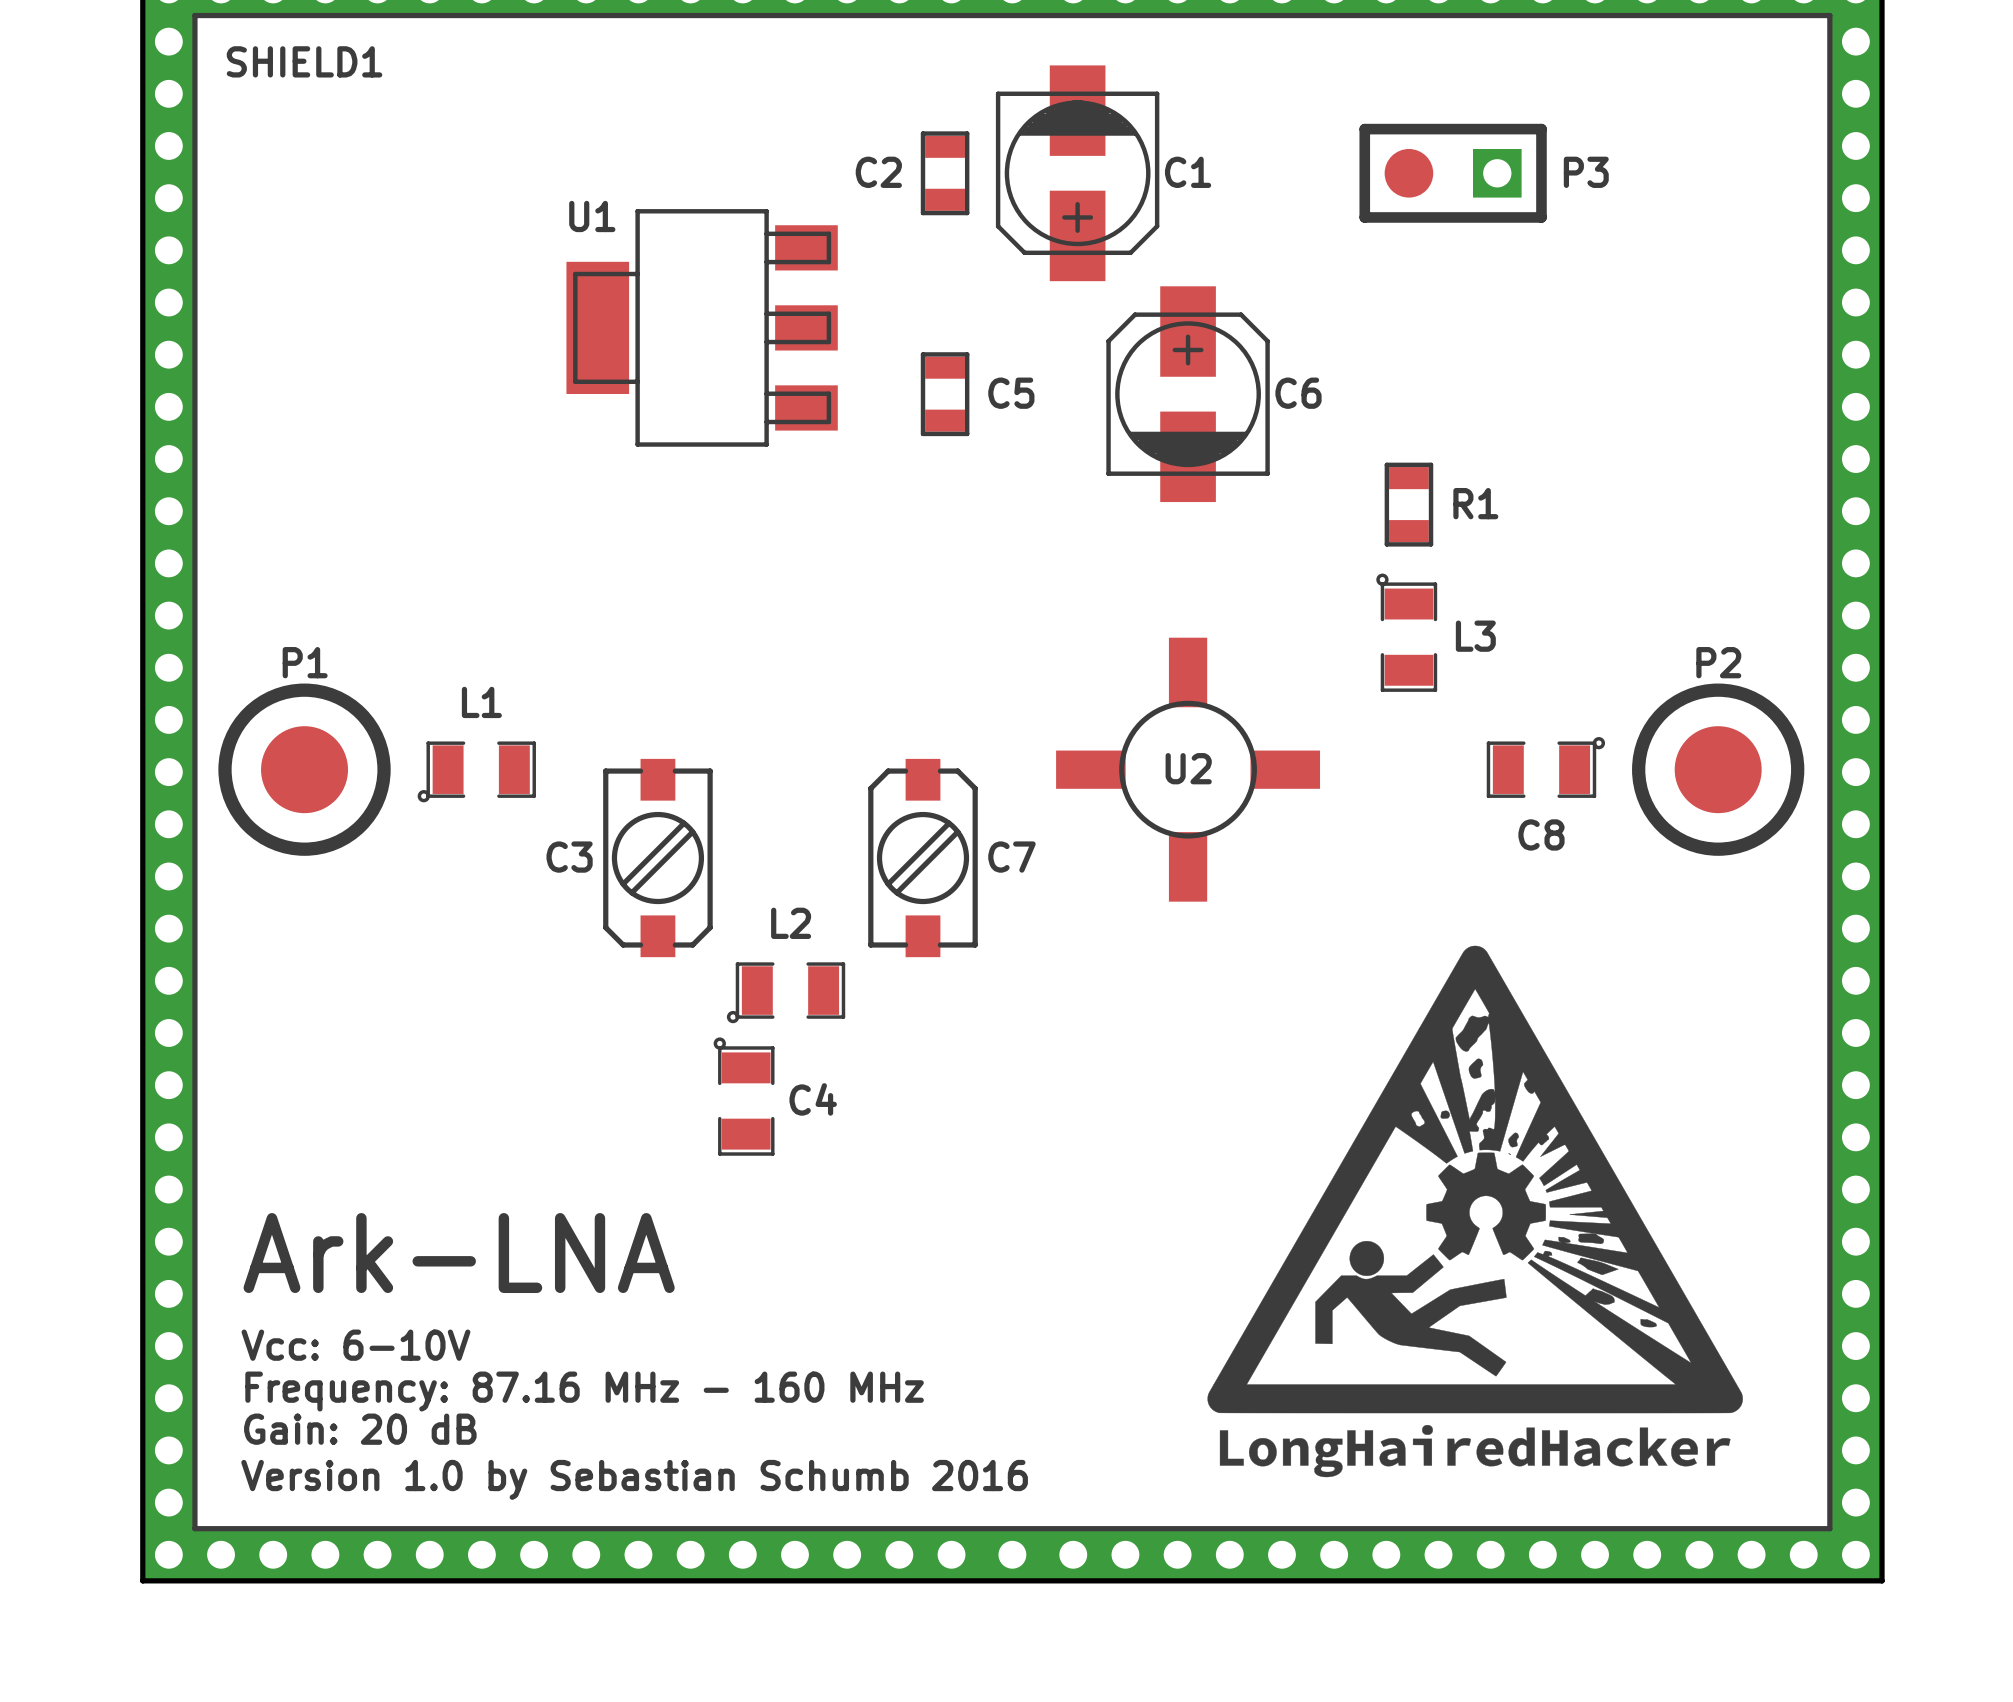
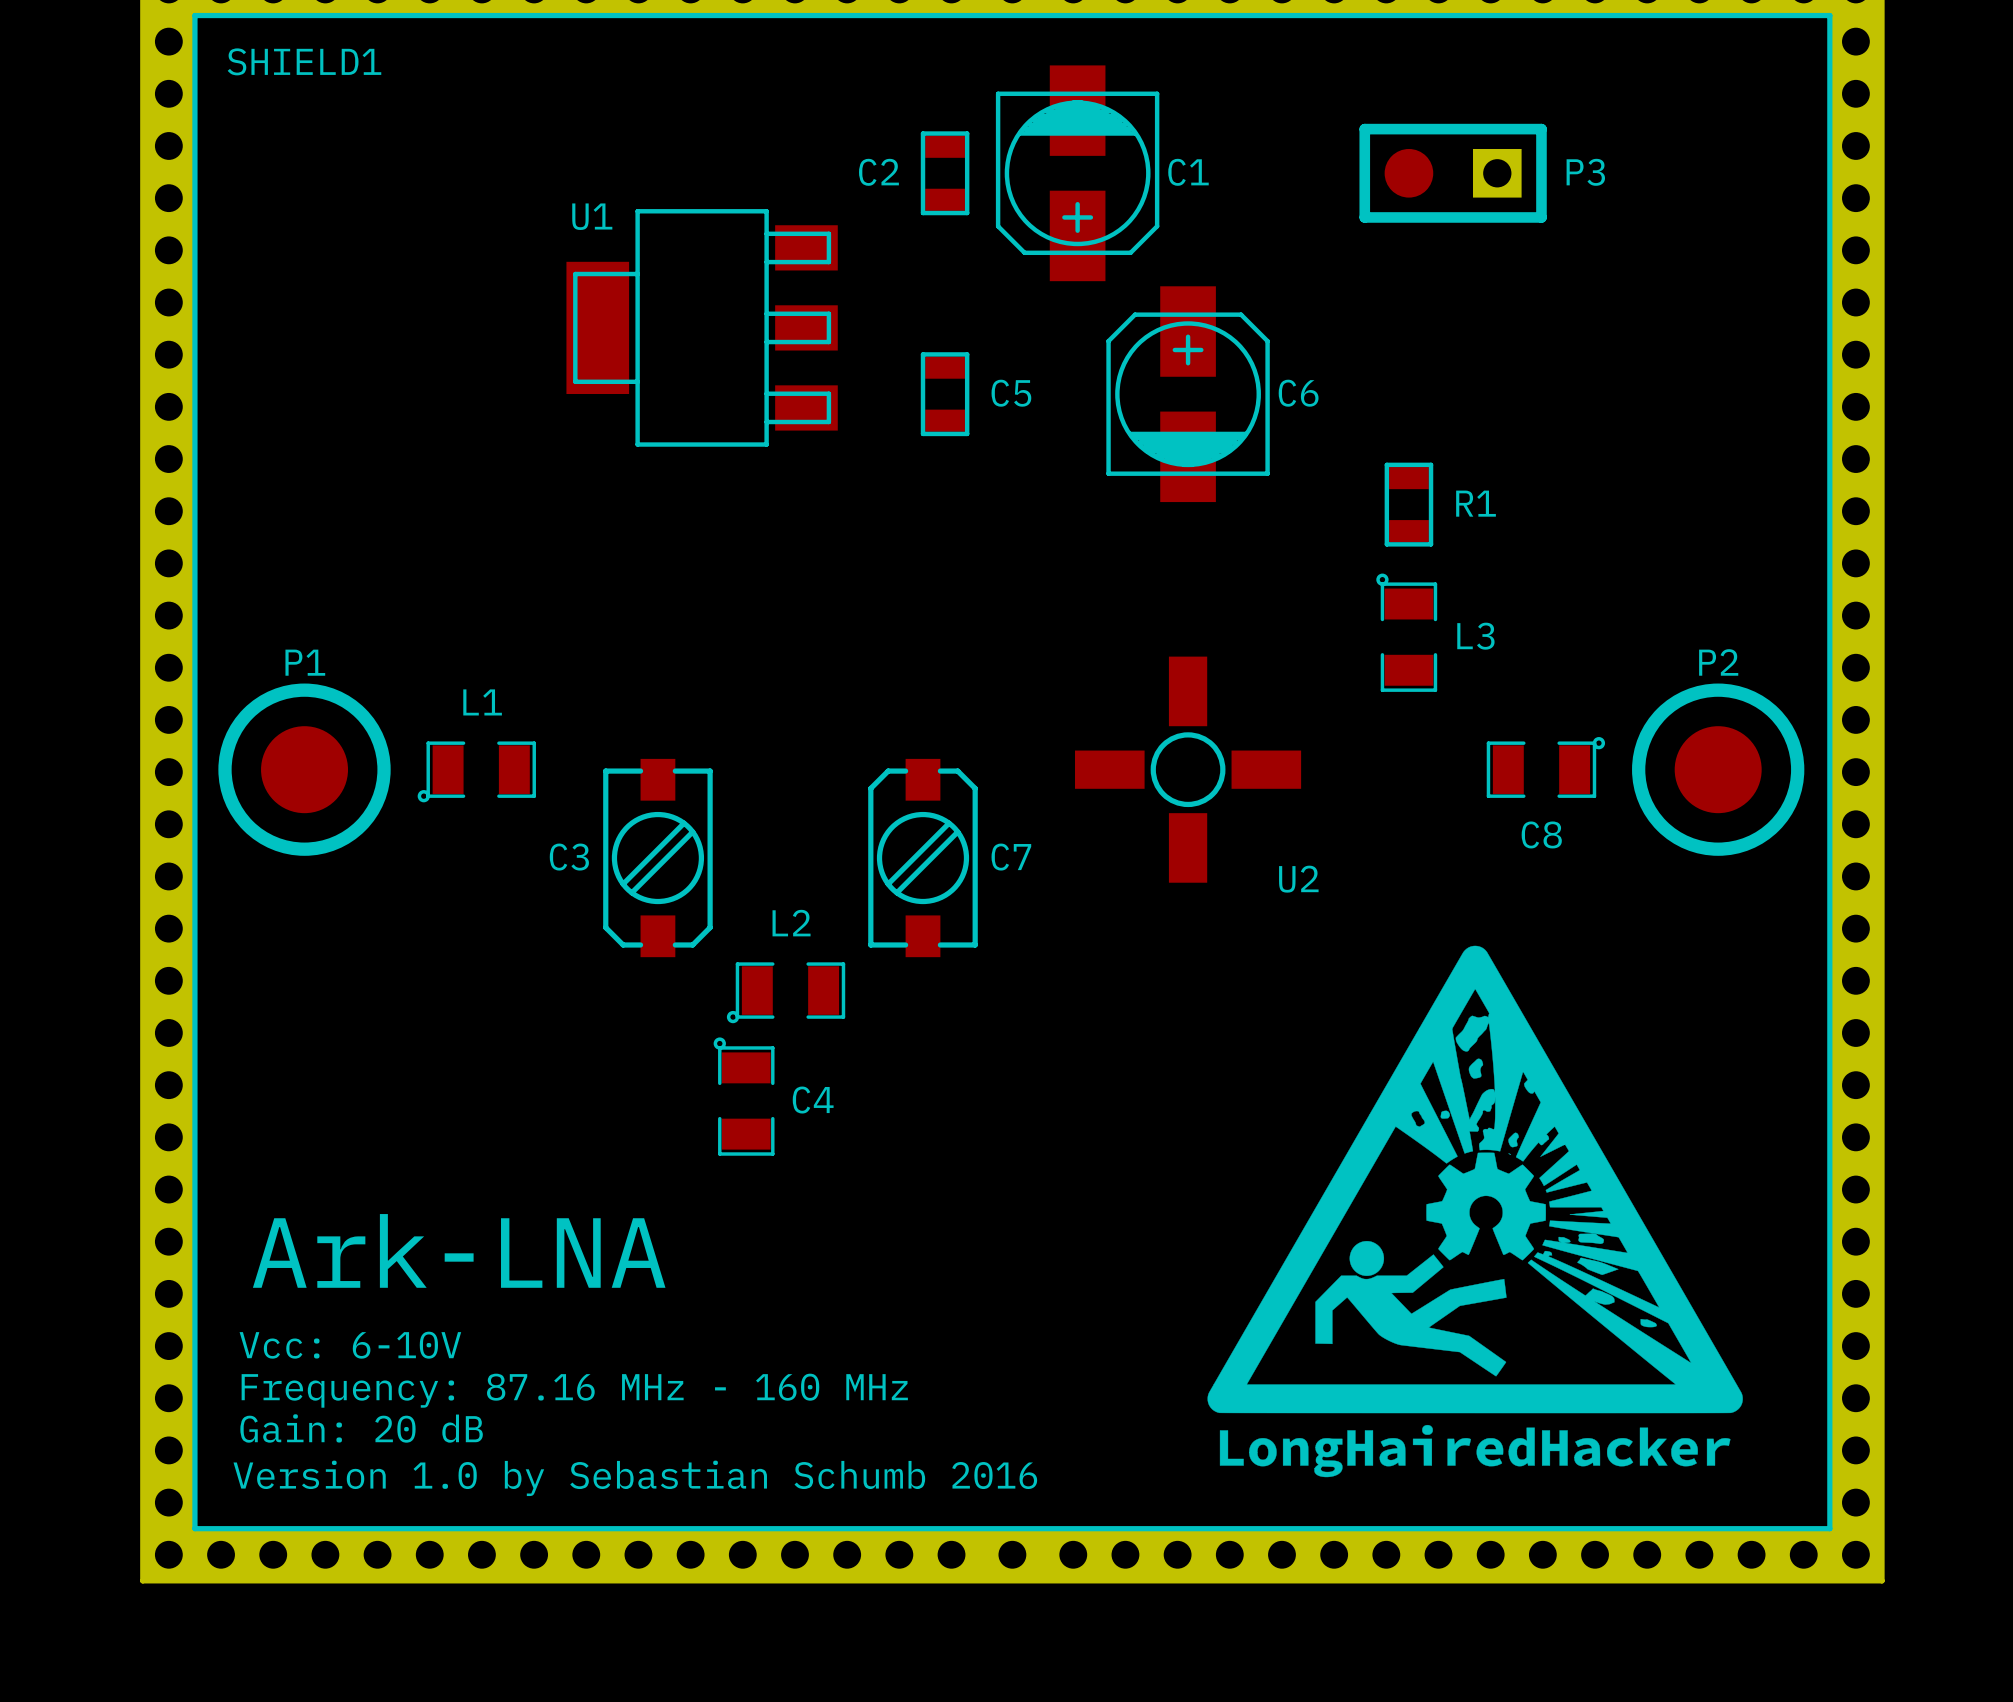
U2 footprint: [1056, 637, 1321, 902] -> [1075, 656, 1302, 883]
U2 name position: U2 (1188, 768) -> U2 (1298, 879)

